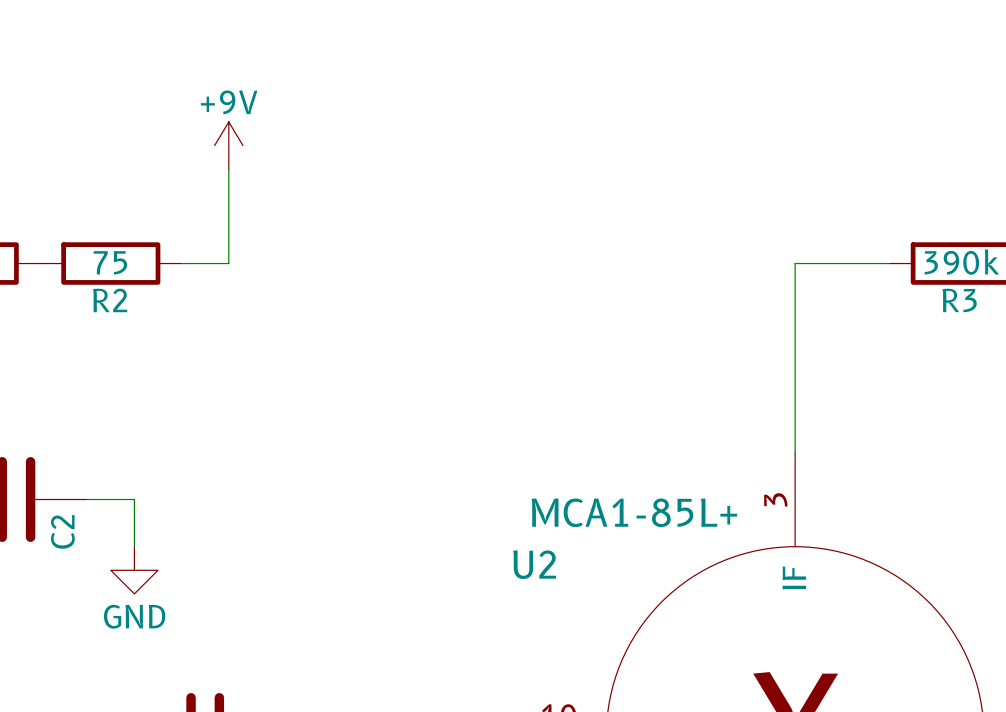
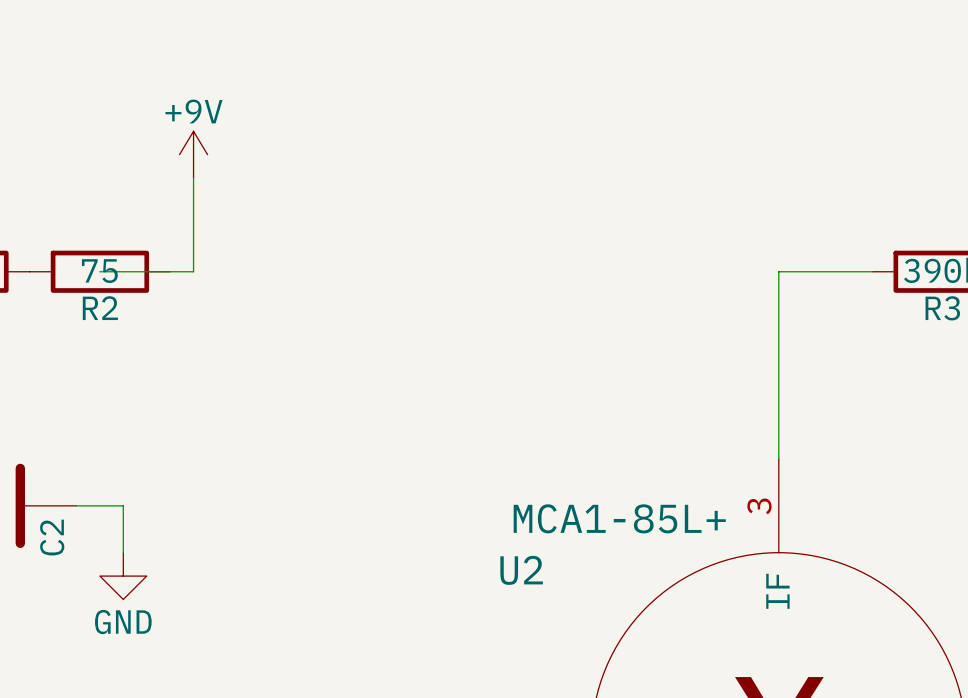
power symbol position: +9V (228, 145) -> +9V (193, 154)
wire: (228, 169) (228, 263) (205, 263) -> (193, 178) (193, 271)
wire: none -> (99, 271) (170, 271)

